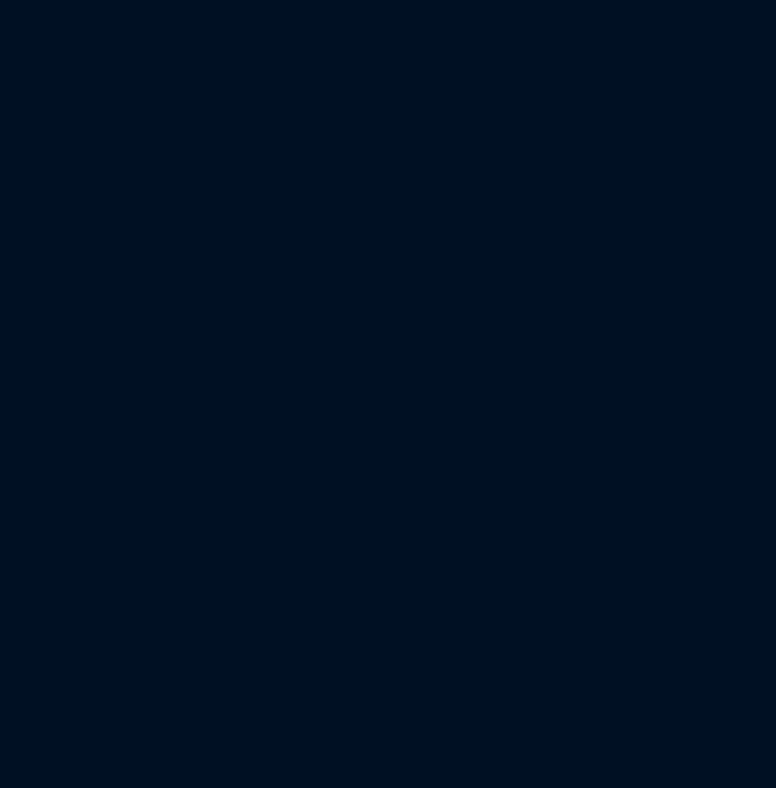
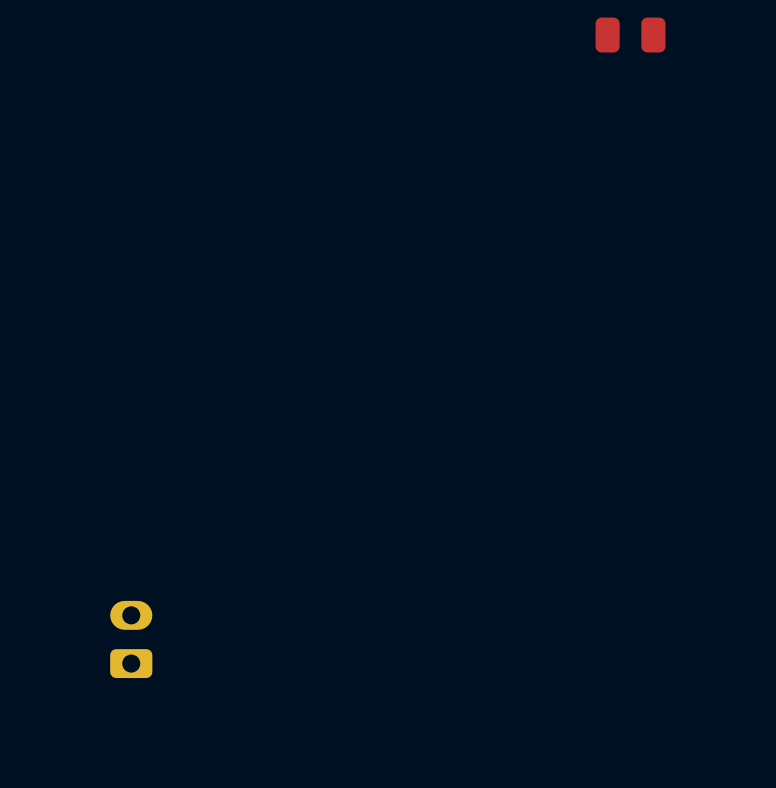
part: none -> (630, 35)
part: none -> (131, 639)

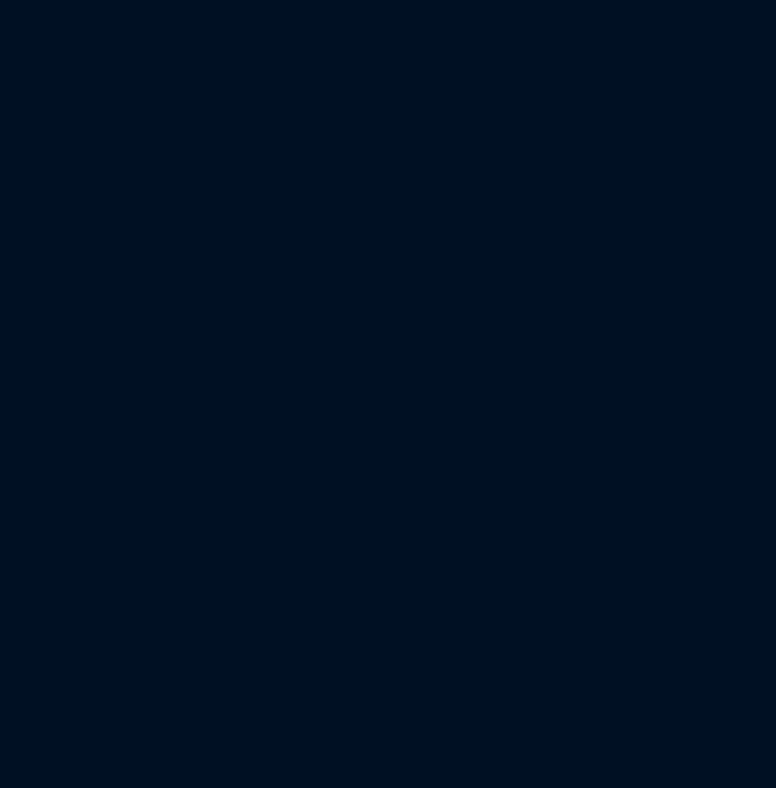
part: (630, 35) -> none
part: (131, 639) -> none

